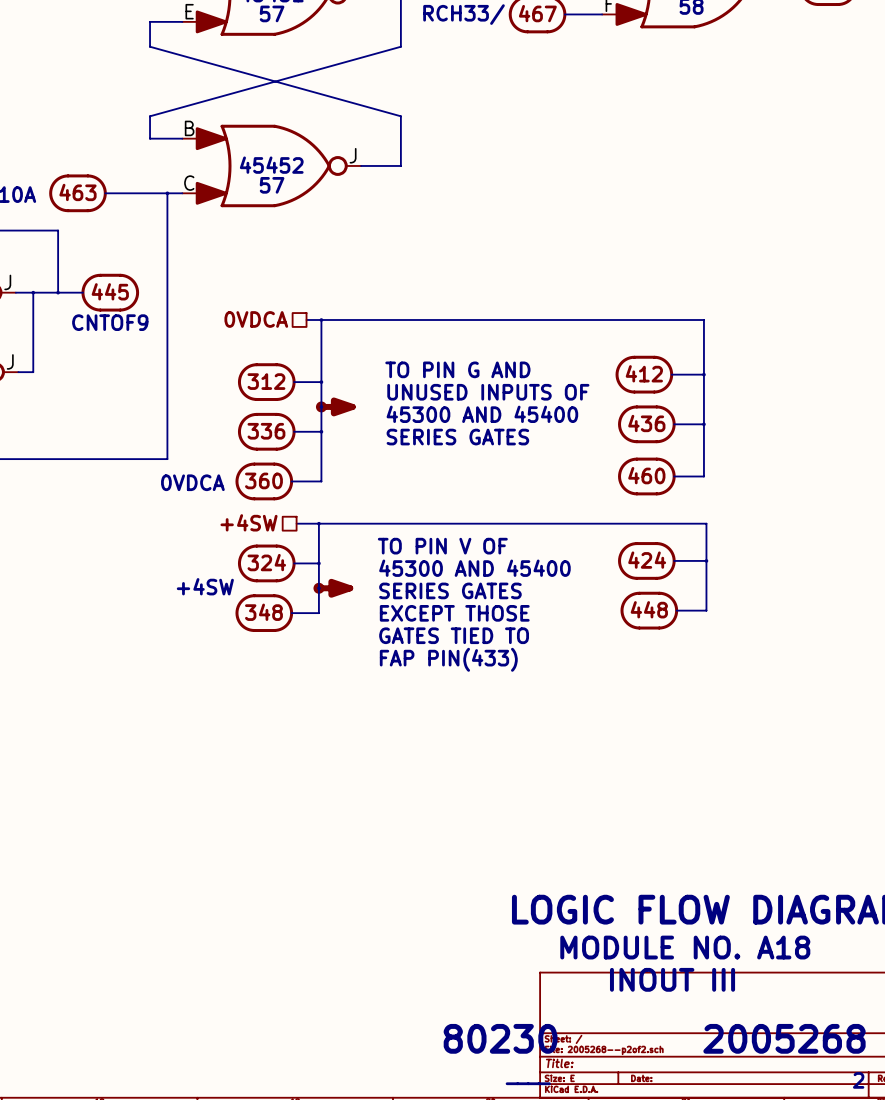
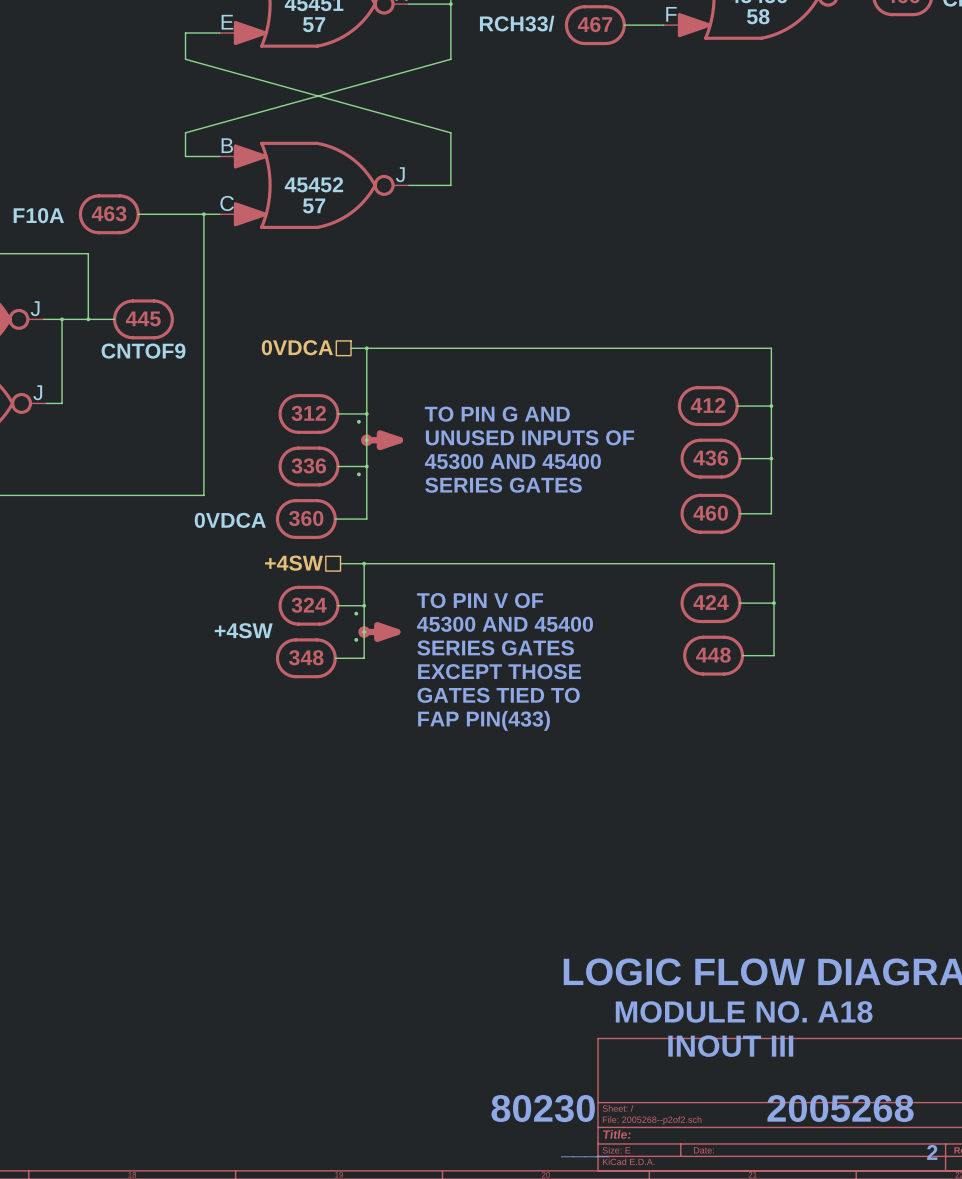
text position: TO PIN G AND (457, 369) -> TO PIN G AND (497, 414)
junction: none -> (358, 421)
text position: UNUSED INPUTS OF (488, 392) -> UNUSED INPUTS OF (529, 437)
text position: 45300 AND 45400 (482, 414) -> 45300 AND 45400 (512, 461)
text position: SERIES GATES (457, 437) -> SERIES GATES (503, 485)
junction: none -> (358, 474)
text position: TO PIN V OF (442, 546) -> TO PIN V OF (479, 600)
text position: 45300 AND 45400 (474, 568) -> 45300 AND 45400 (505, 624)
junction: none -> (356, 613)
text position: SERIES GATES (450, 590) -> SERIES GATES (495, 647)
junction: none -> (356, 639)
text position: EXCEPT THOSE (454, 613) -> EXCEPT THOSE (499, 671)
text position: GATES TIED TO (454, 635) -> GATES TIED TO (498, 695)
text position: FAP PIN(433) (448, 659) -> FAP PIN(433) (484, 720)

